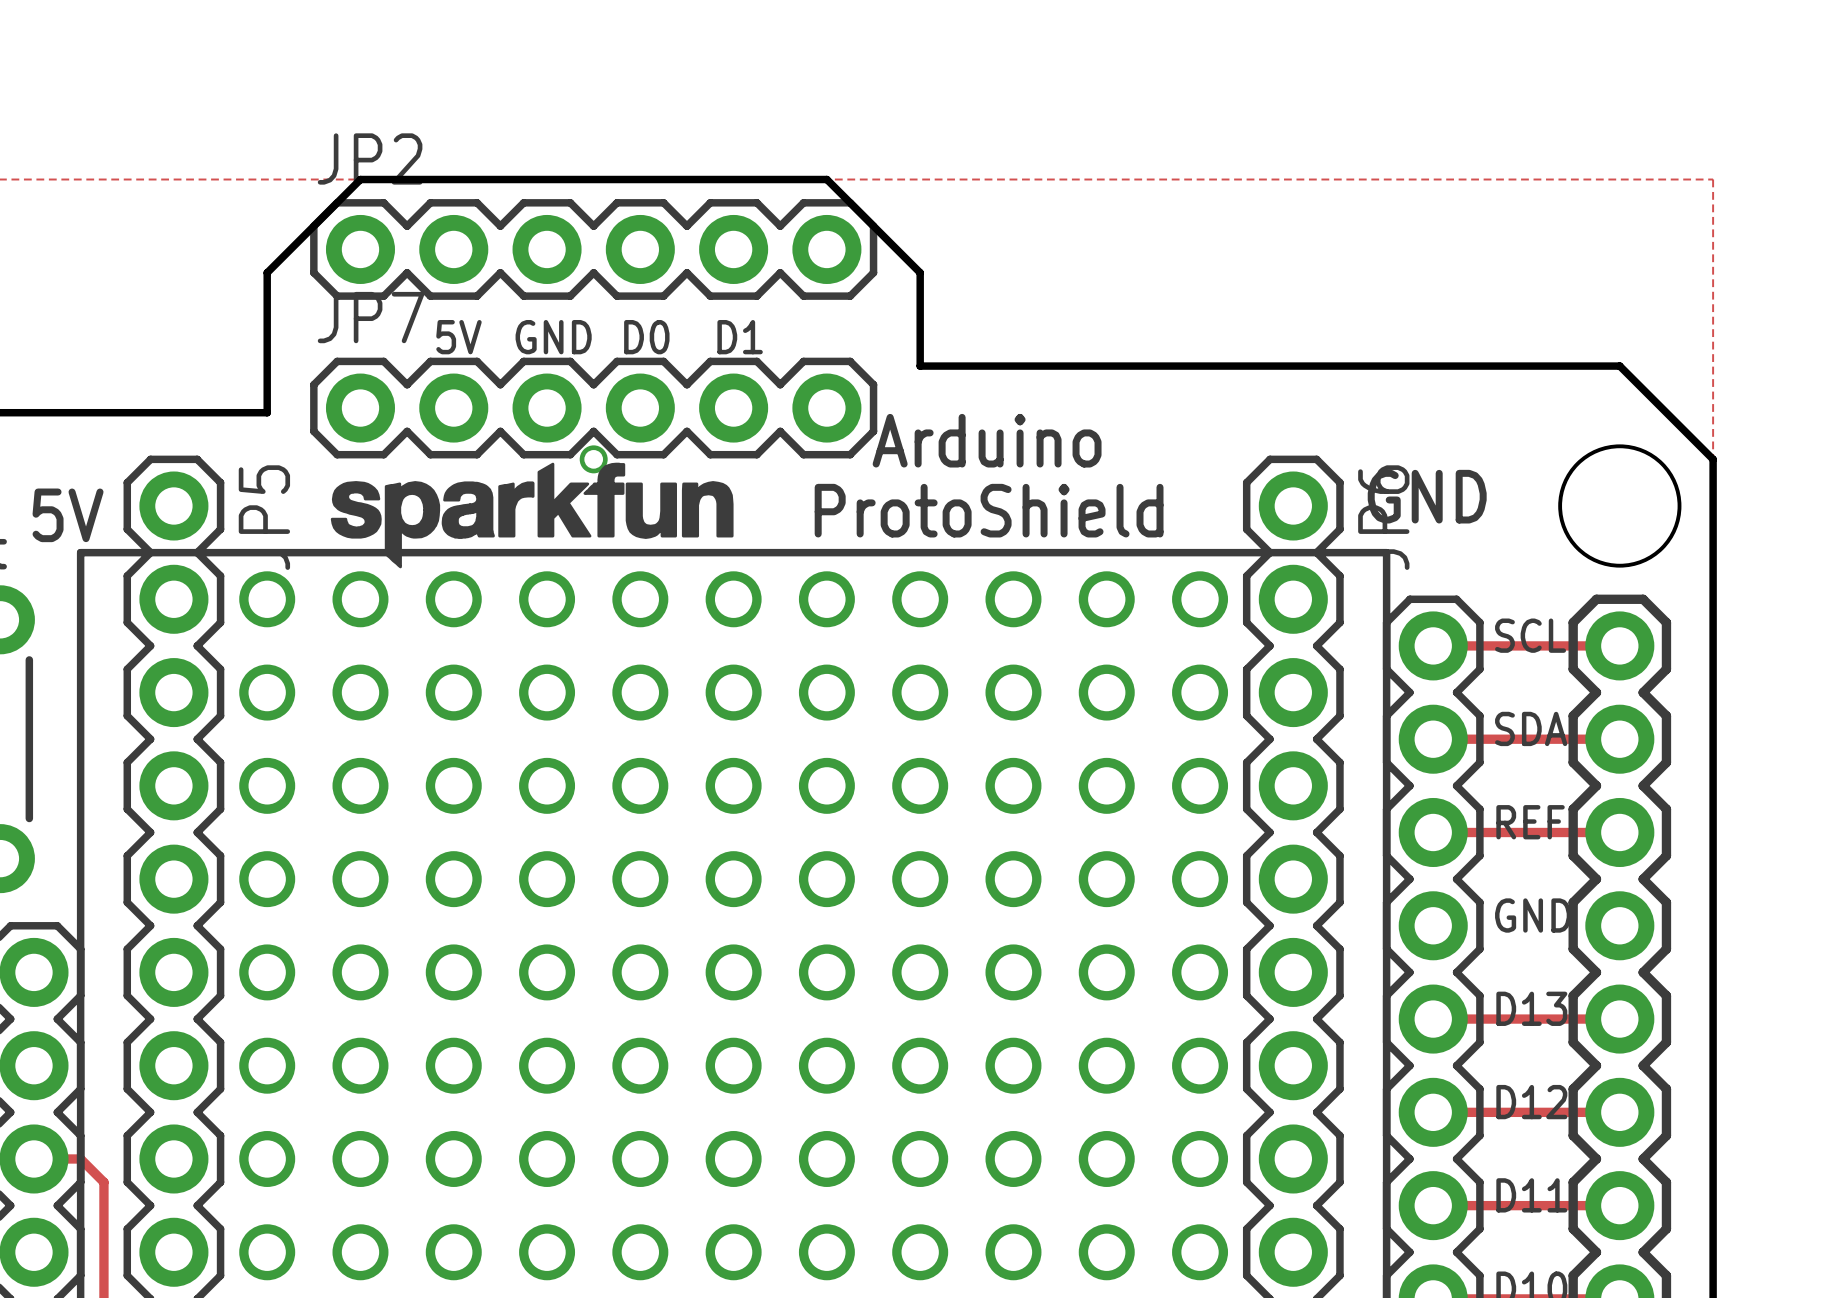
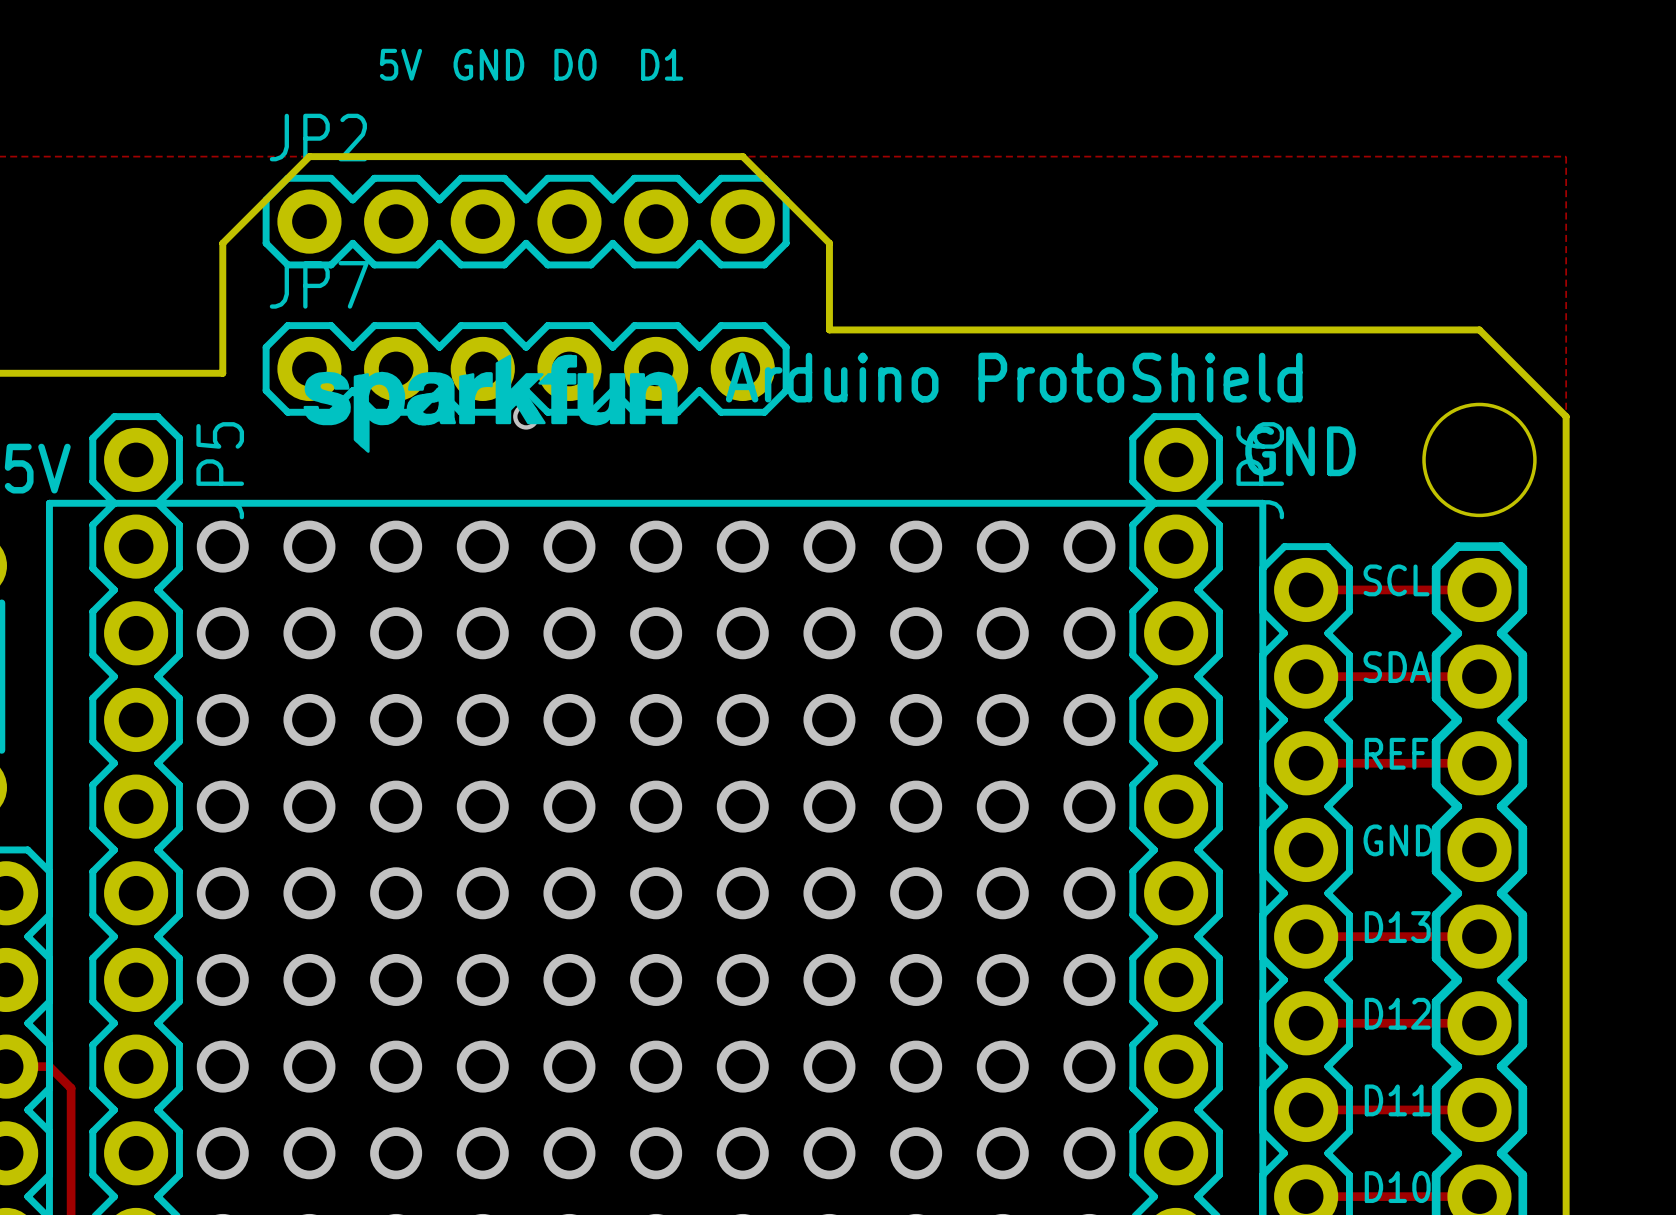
text position: 5V (458, 337) -> 5V (400, 64)
text position: GND (553, 337) -> GND (488, 64)
text position: D0 (646, 337) -> D0 (575, 64)
text position: D1 (740, 337) -> D1 (662, 64)
text: Arduino (987, 440) -> Arduino ProtoShield (1014, 377)
text: ProtoShield (989, 510) -> none
drawing position: (532, 515) -> (490, 403)

